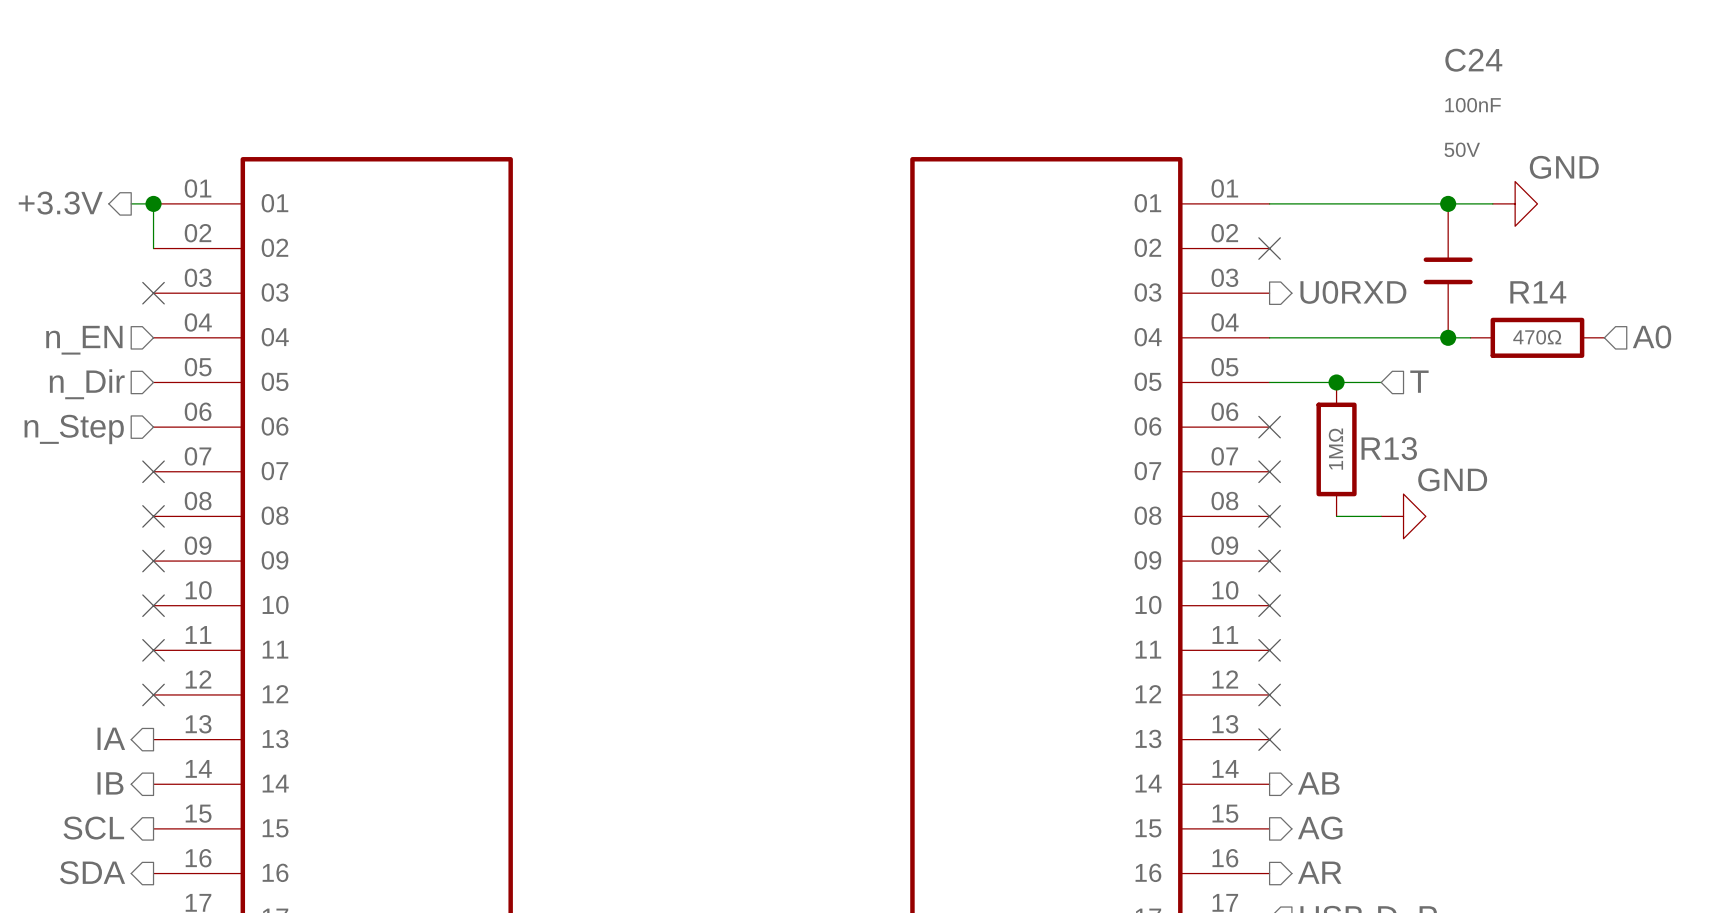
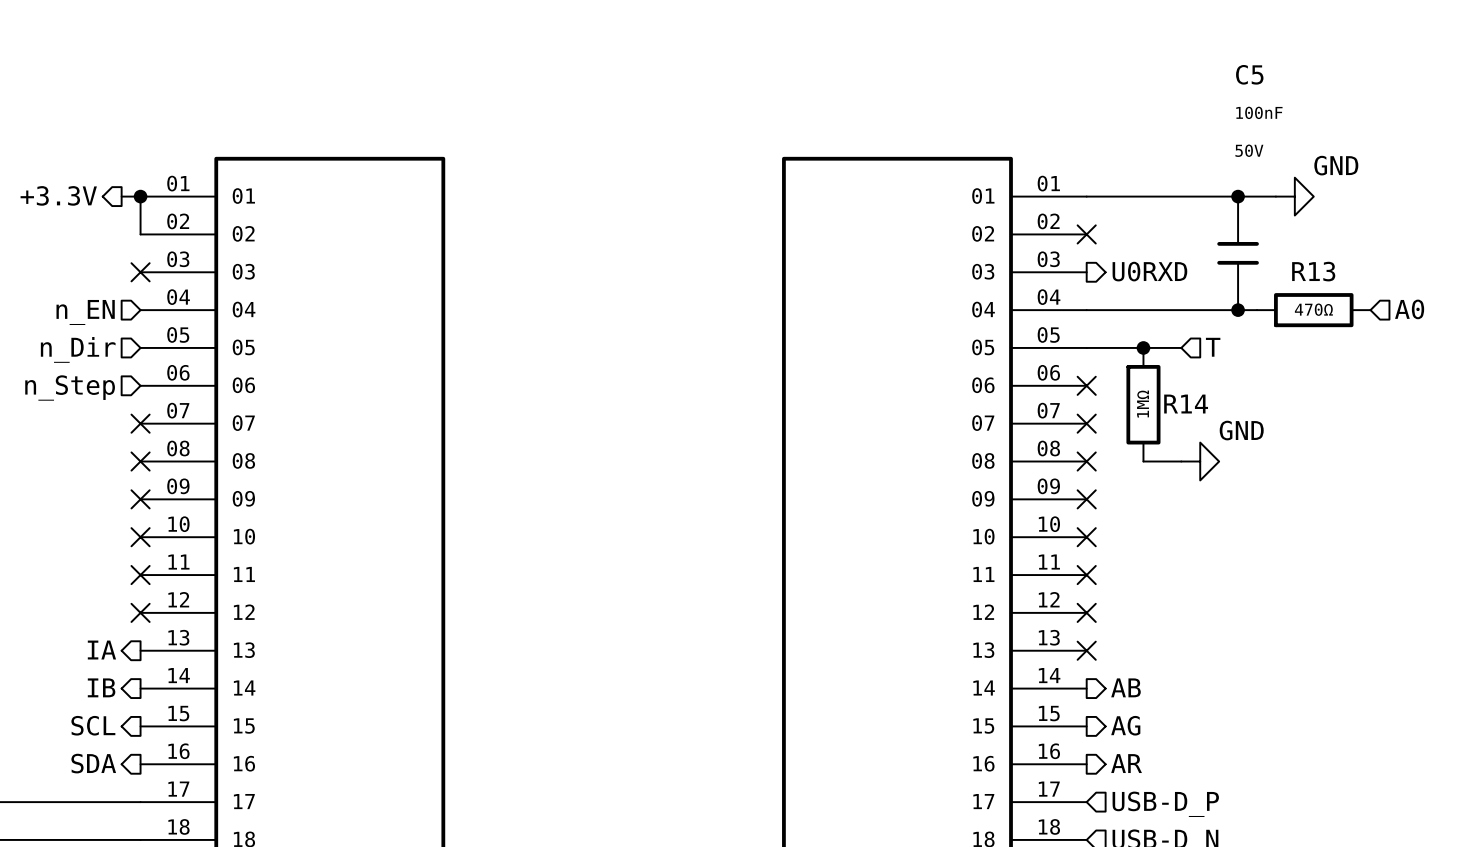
C24 name: C24 (1473, 60) -> C5 (1249, 74)
R14 name: R14 (1538, 292) -> R13 (1313, 271)
R13 name: R13 (1389, 448) -> R14 (1186, 404)

